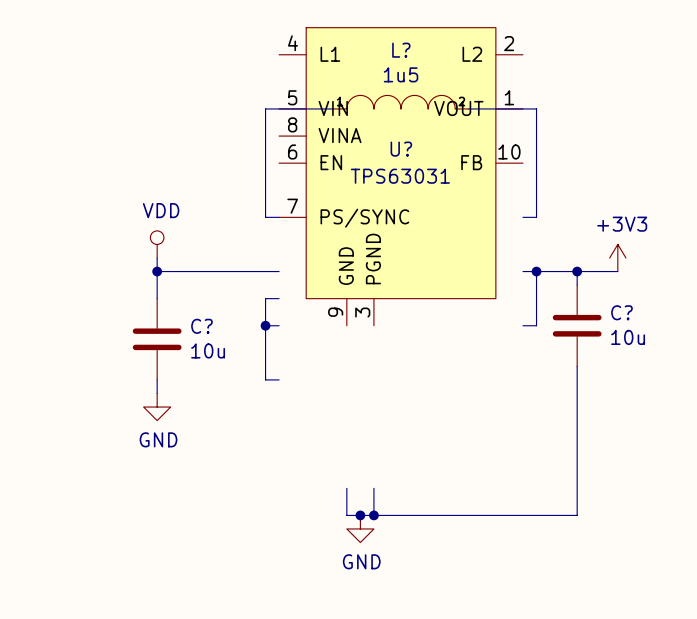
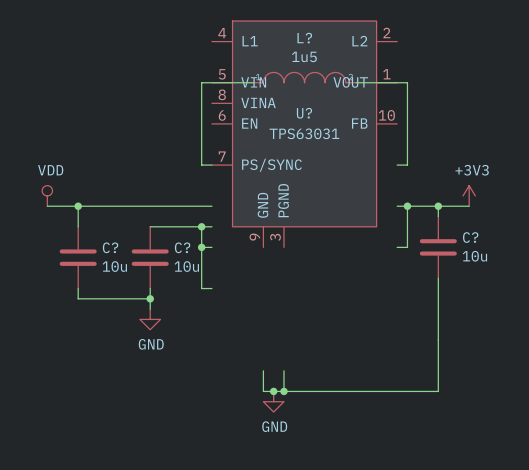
power symbol position: VDD (157, 244) -> VDD (47, 195)
wire: (157, 258) (157, 298) -> none
wire: none -> (47, 206) (119, 206)
wire: none -> (78, 206) (78, 226)
junction position: (157, 271) -> (78, 206)
wire: none -> (150, 226) (201, 226)
junction: none -> (201, 226)
C?: none -> 10u (78, 257)
C?: 10u (157, 339) -> none
C?: none -> 10u (150, 257)
wire: none -> (78, 288) (78, 298) (150, 298)
wire: (157, 379) (157, 393) -> none
wire: none -> (150, 288) (150, 309)
junction: none -> (150, 298)
power symbol position: GND (157, 407) -> GND (150, 319)

